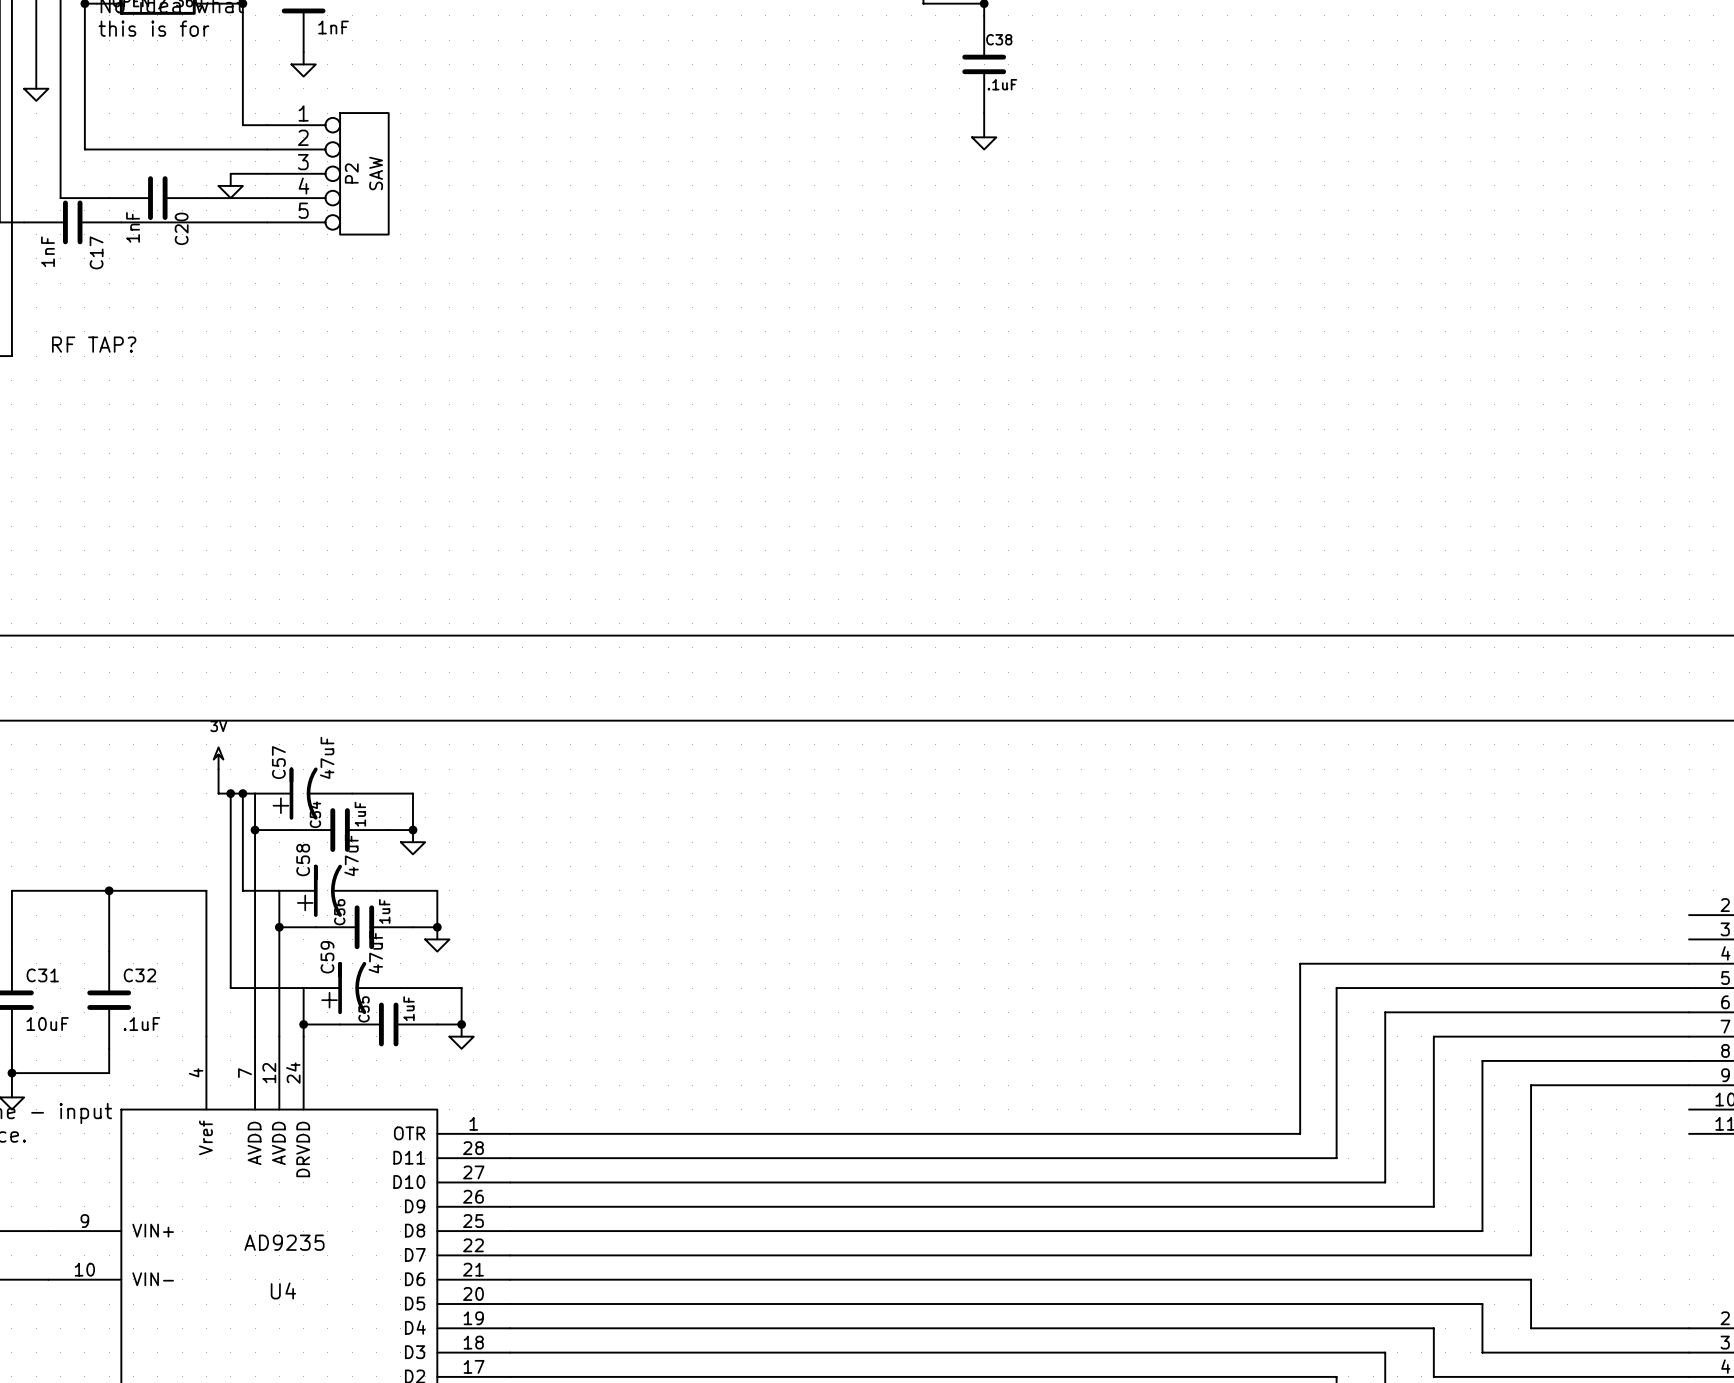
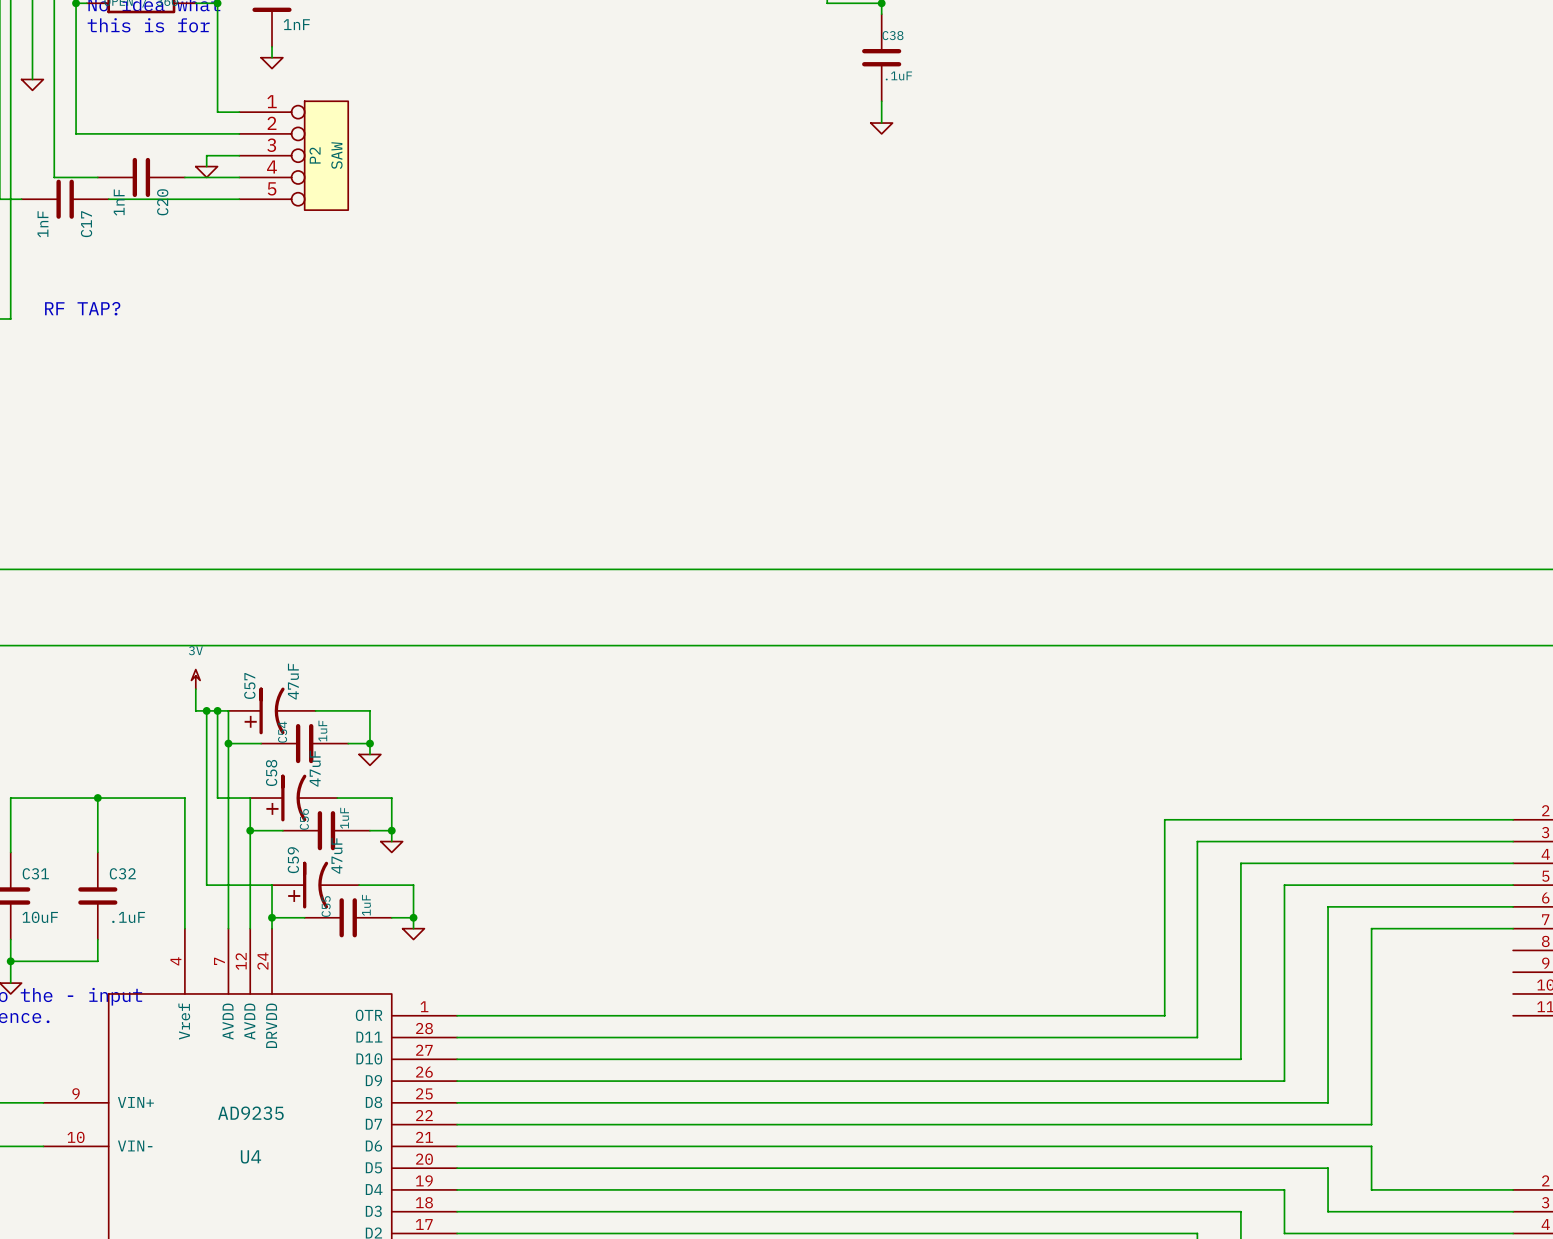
wire: none -> (1513, 819) (1164, 819) (1164, 863)
wire: none -> (1513, 841) (1197, 841) (1197, 885)
wire: (1300, 963) (1385, 963) -> (1240, 906) (1240, 863)
wire: (1336, 988) (1433, 988) -> (1284, 928) (1284, 885)
wire: (1385, 1012) (1482, 1012) -> (1328, 950) (1328, 906)
wire: (1433, 1036) (1531, 1036) -> (1371, 972) (1371, 928)
wire: (1482, 1060) (1689, 1060) -> none
wire: (1531, 1085) (1689, 1085) -> none

